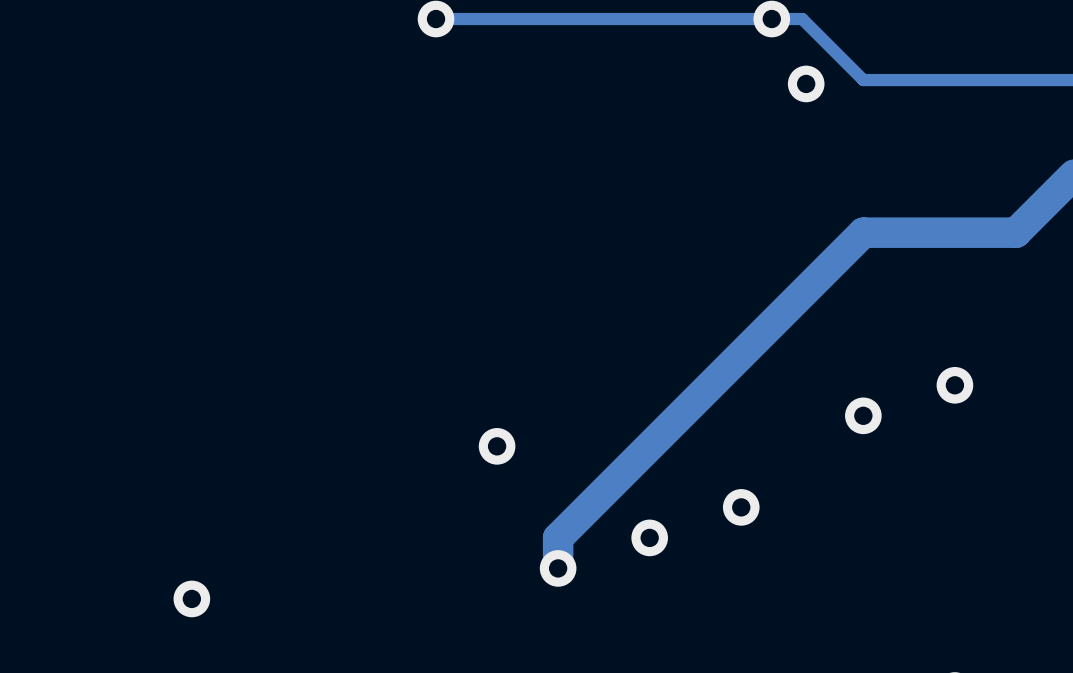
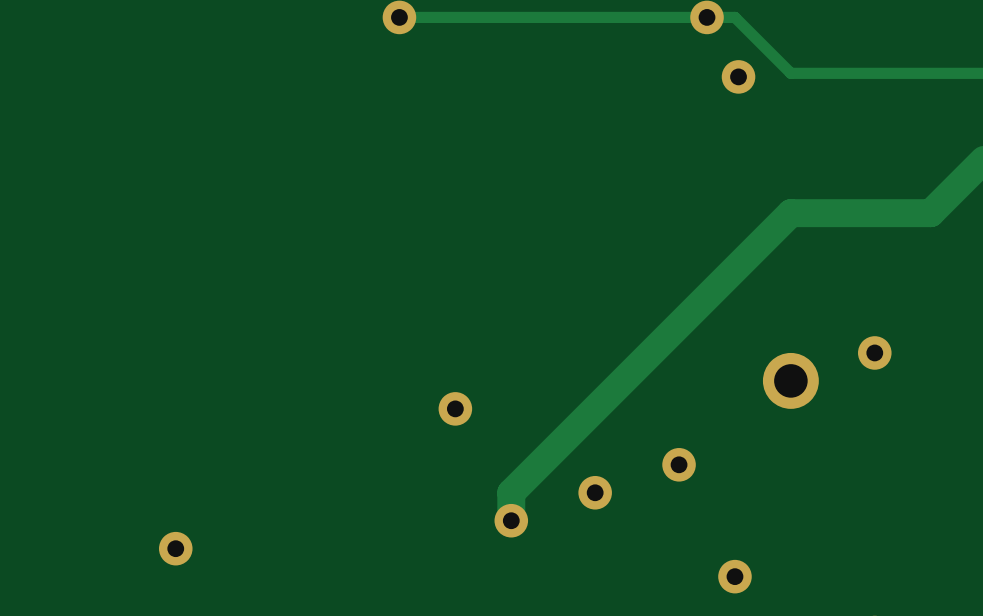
via size: [845, 397, 882, 435] -> [762, 352, 819, 409]
via: none -> (734, 576)

